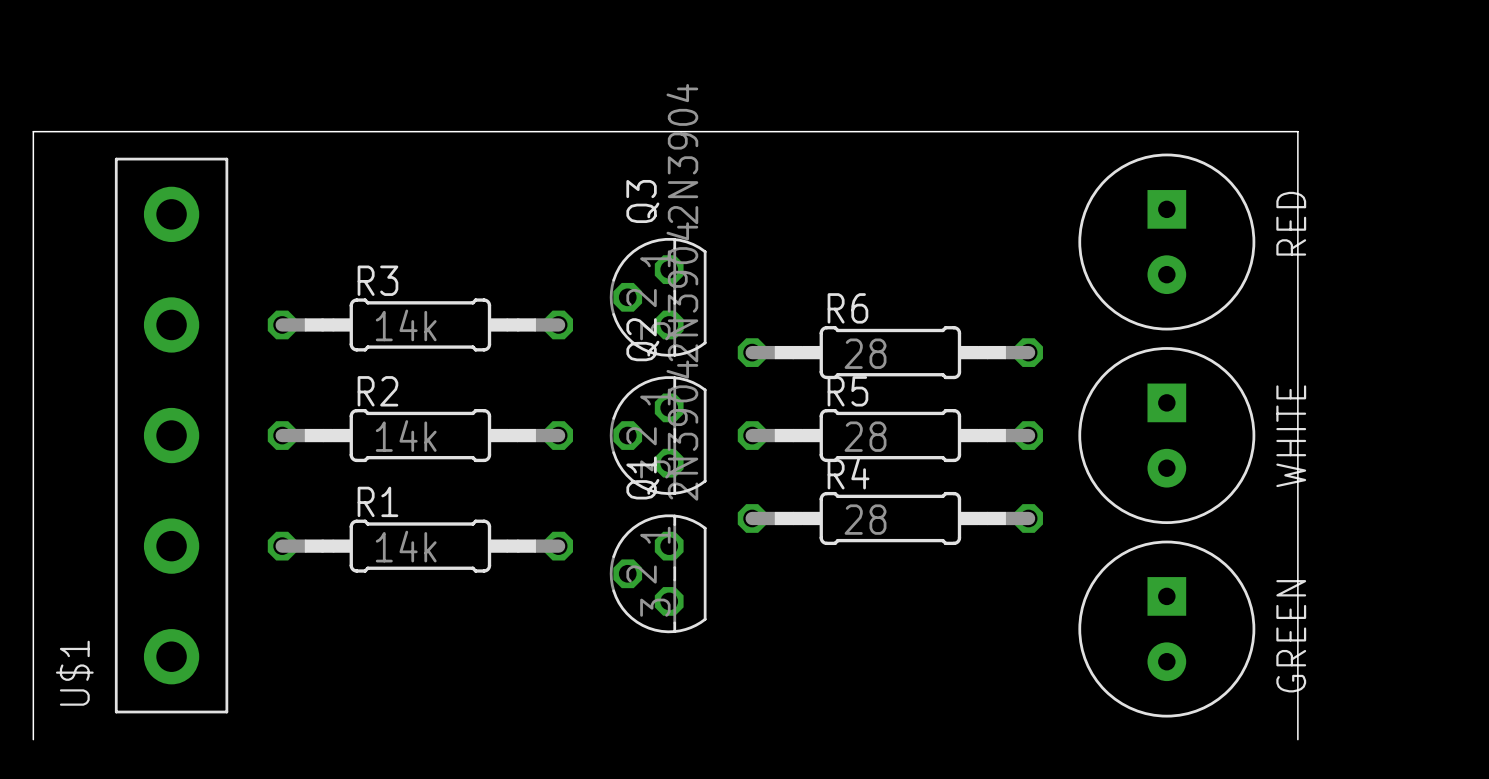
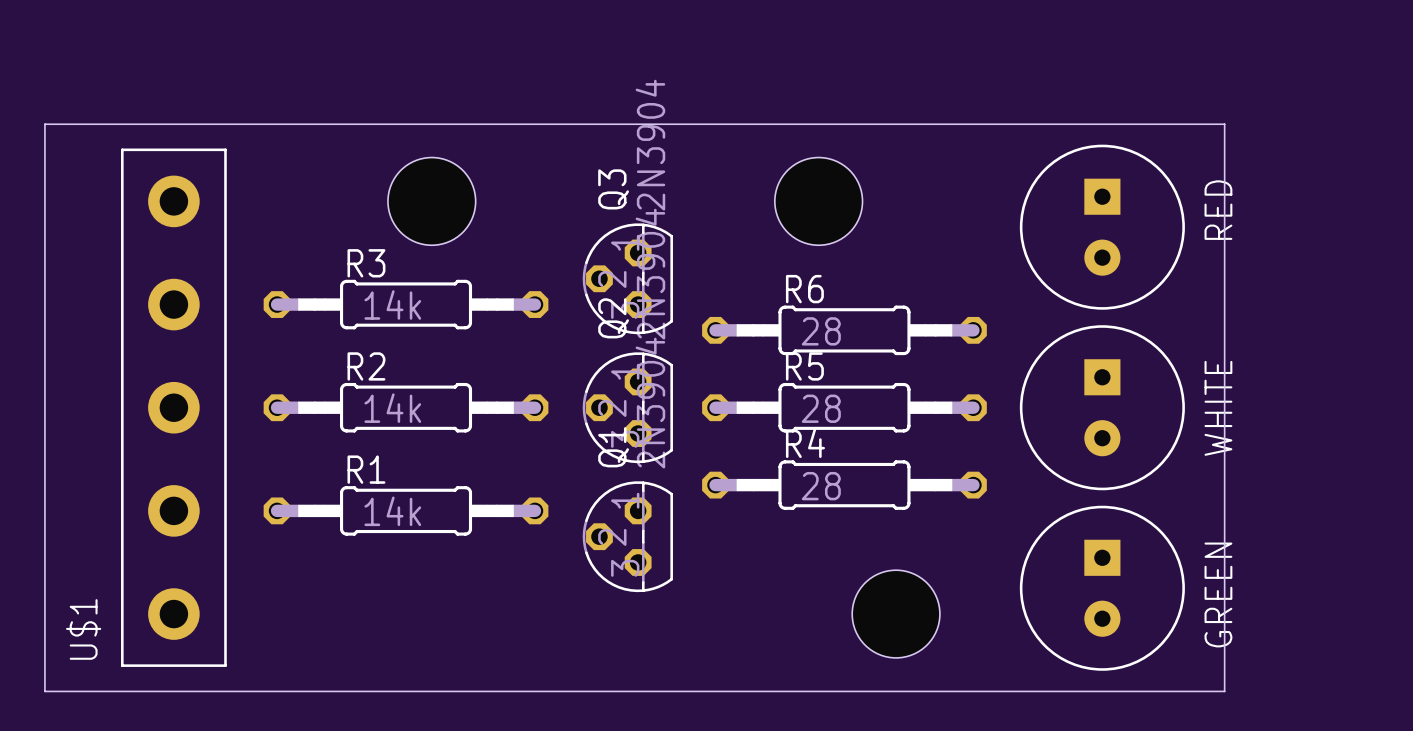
hole: none -> (431, 201)
hole: none -> (818, 201)
hole: none -> (896, 614)
board edge: none -> (44, 691) (1224, 691)

